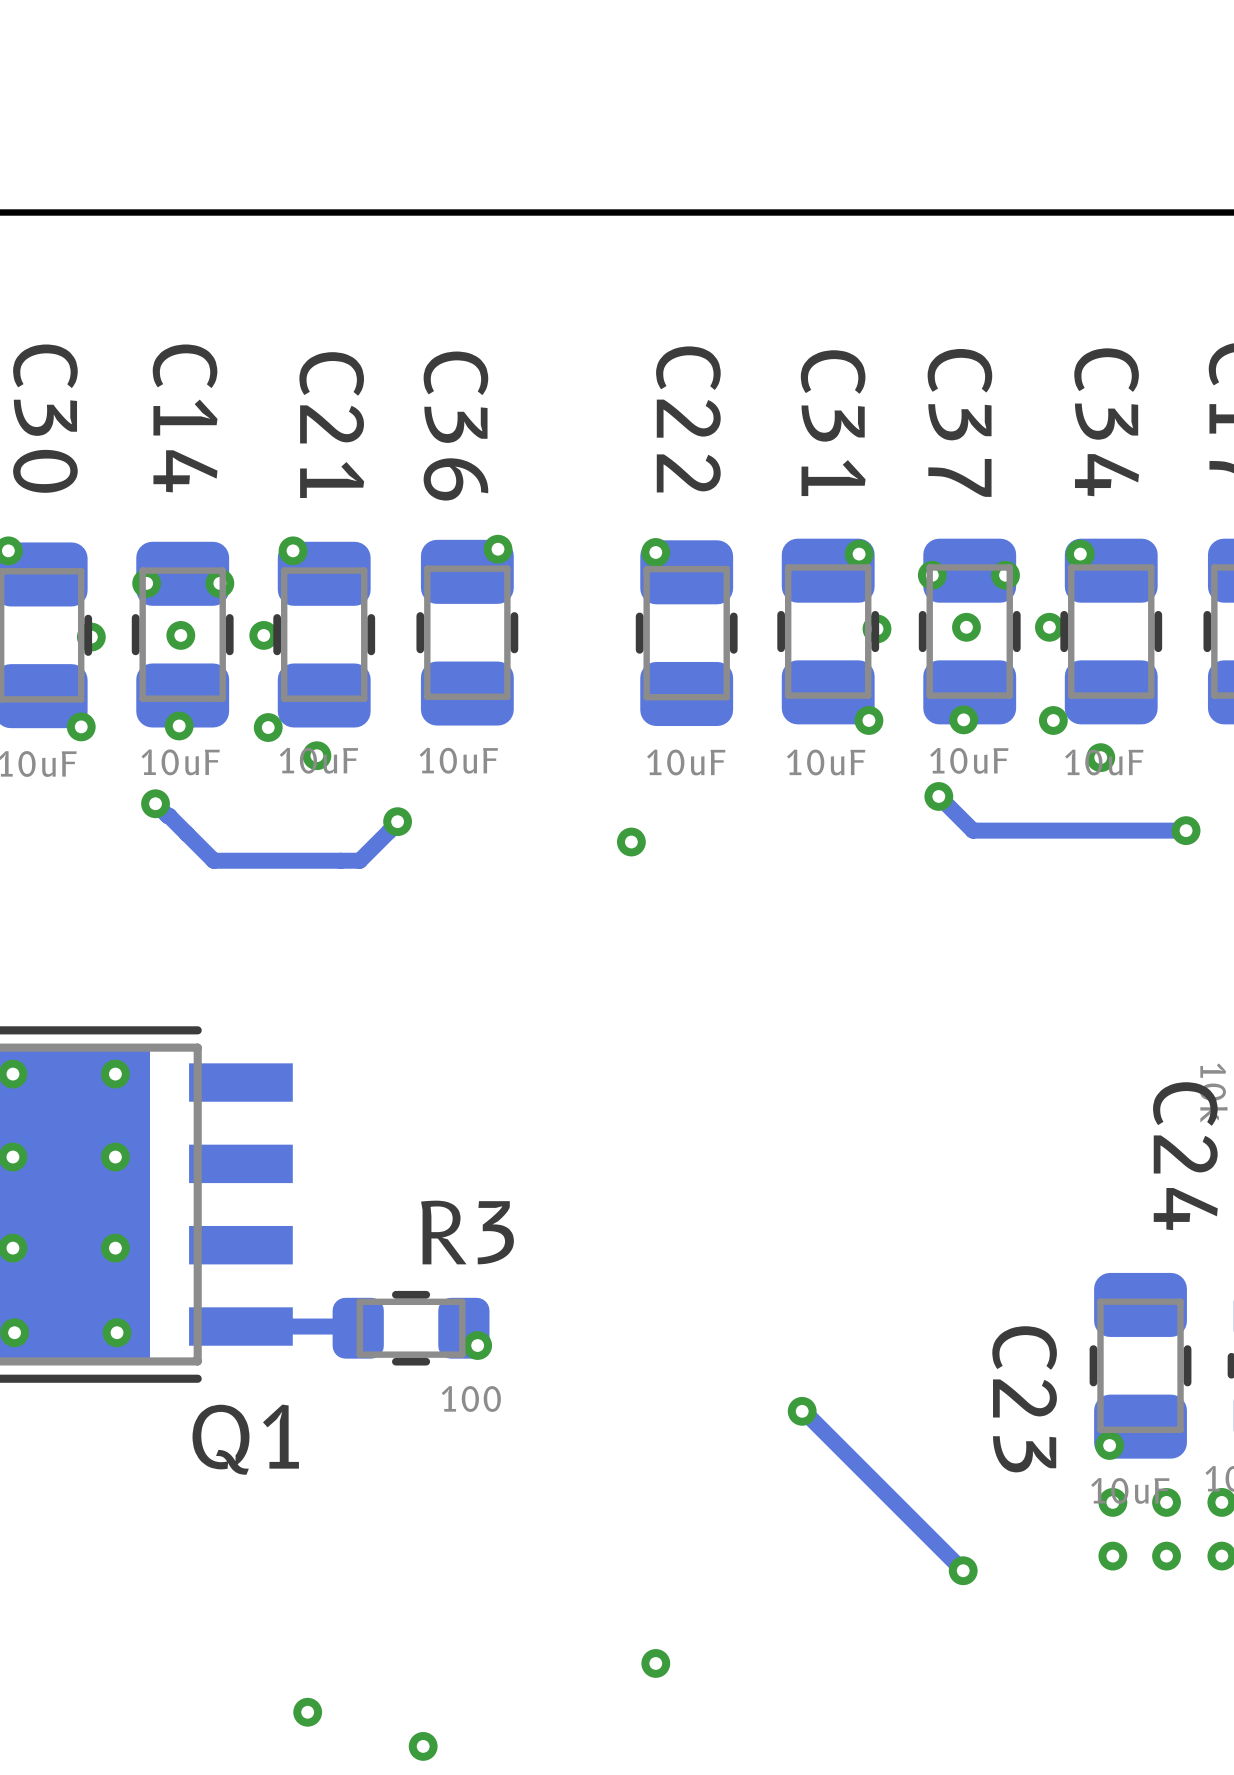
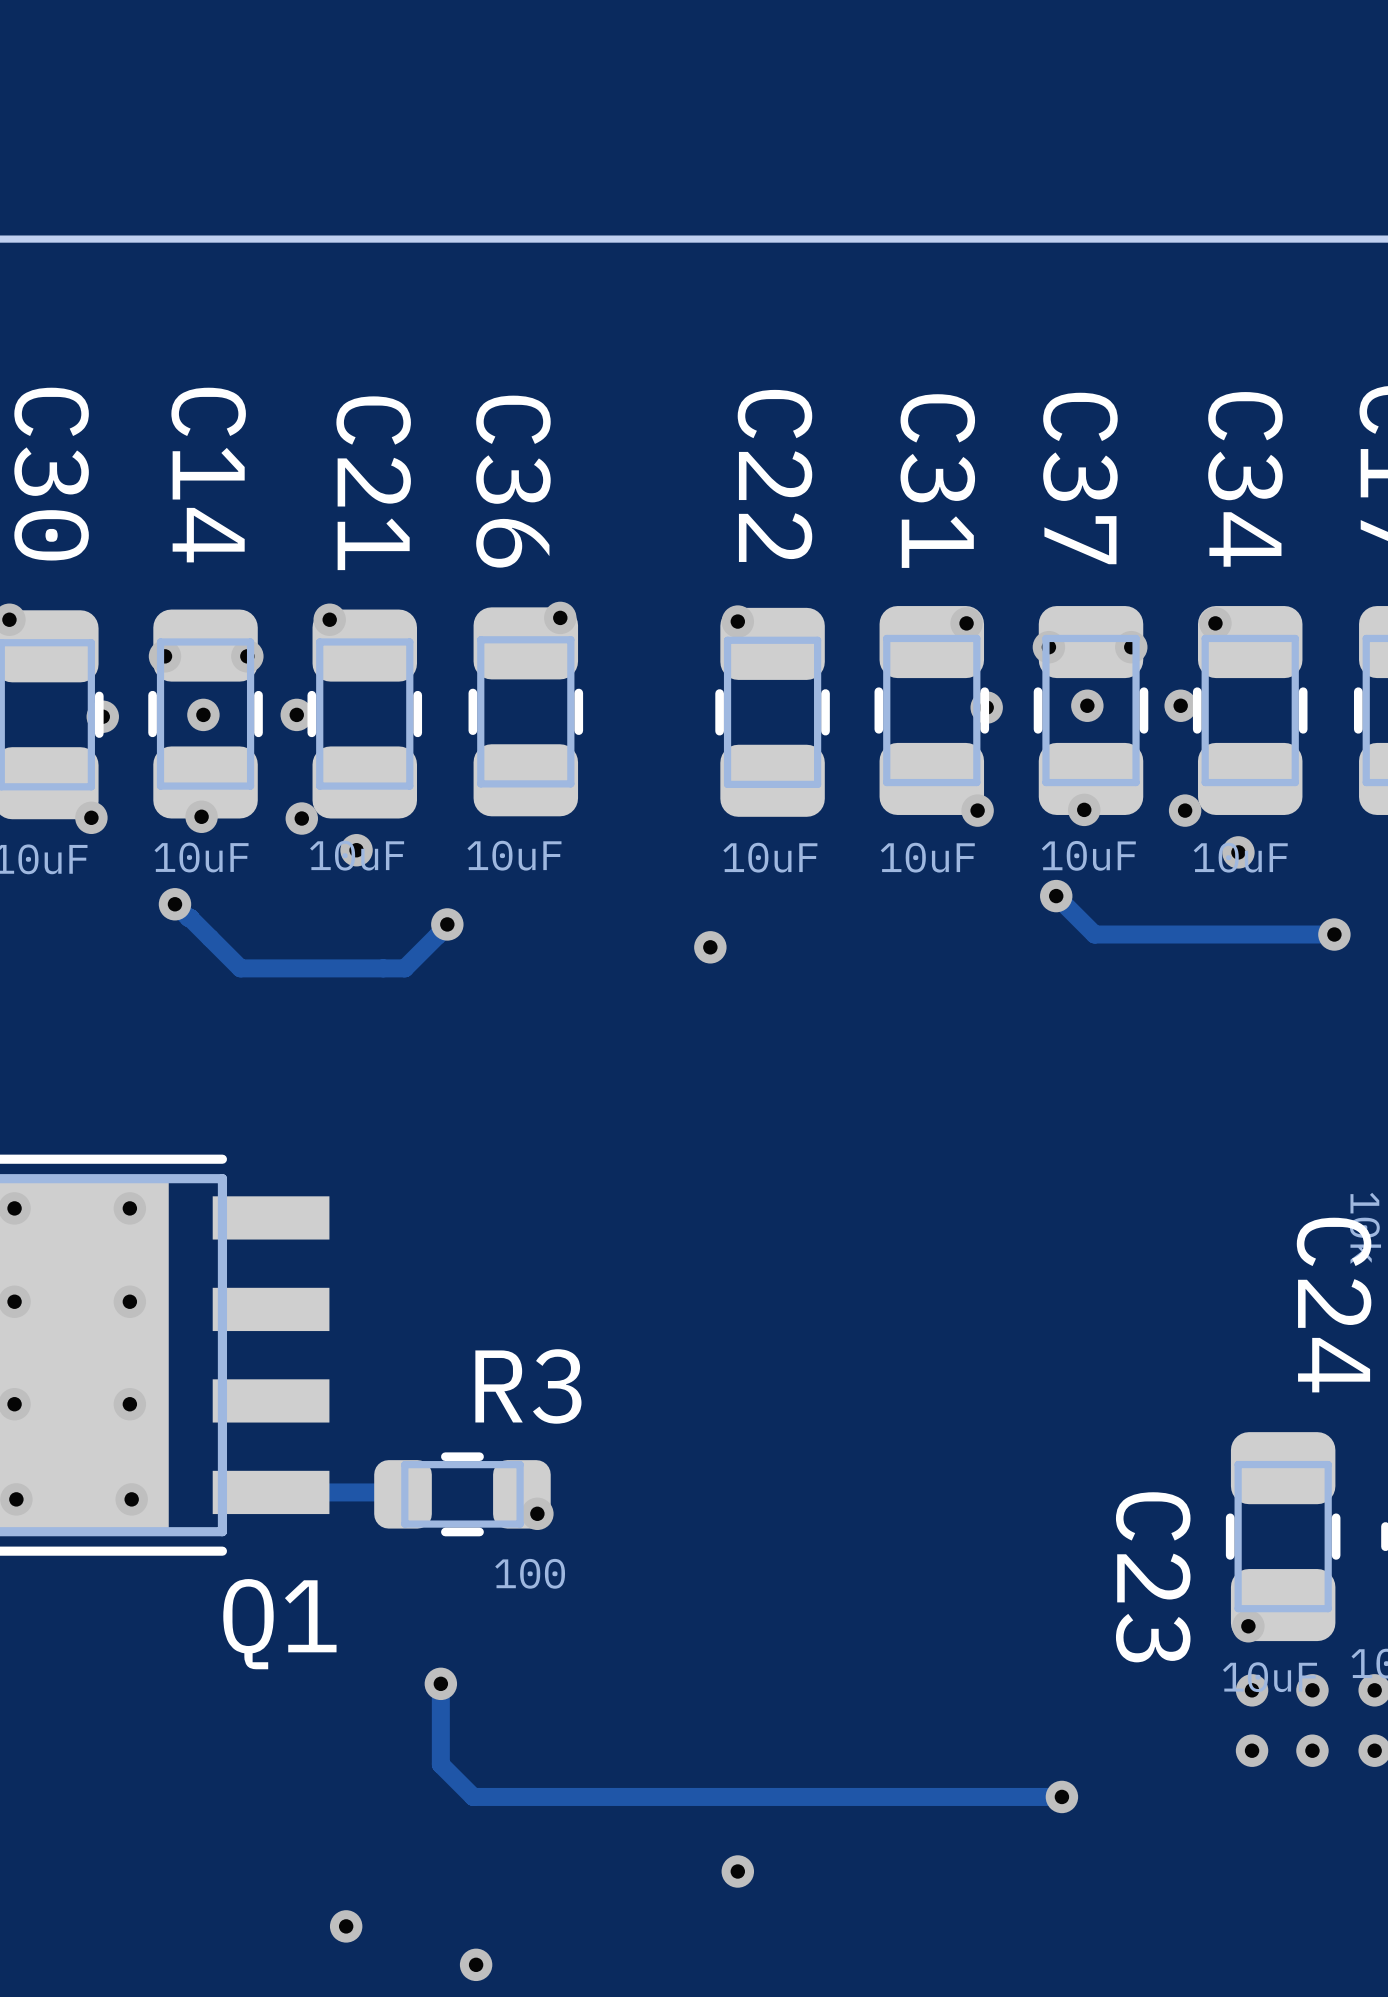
track: (802, 1411) (963, 1570) -> none
via: (802, 1411) -> none
track: none -> (440, 1683) (440, 1764) (473, 1796) (1061, 1796)
via: none -> (440, 1683)
via position: (963, 1570) -> (1061, 1796)

